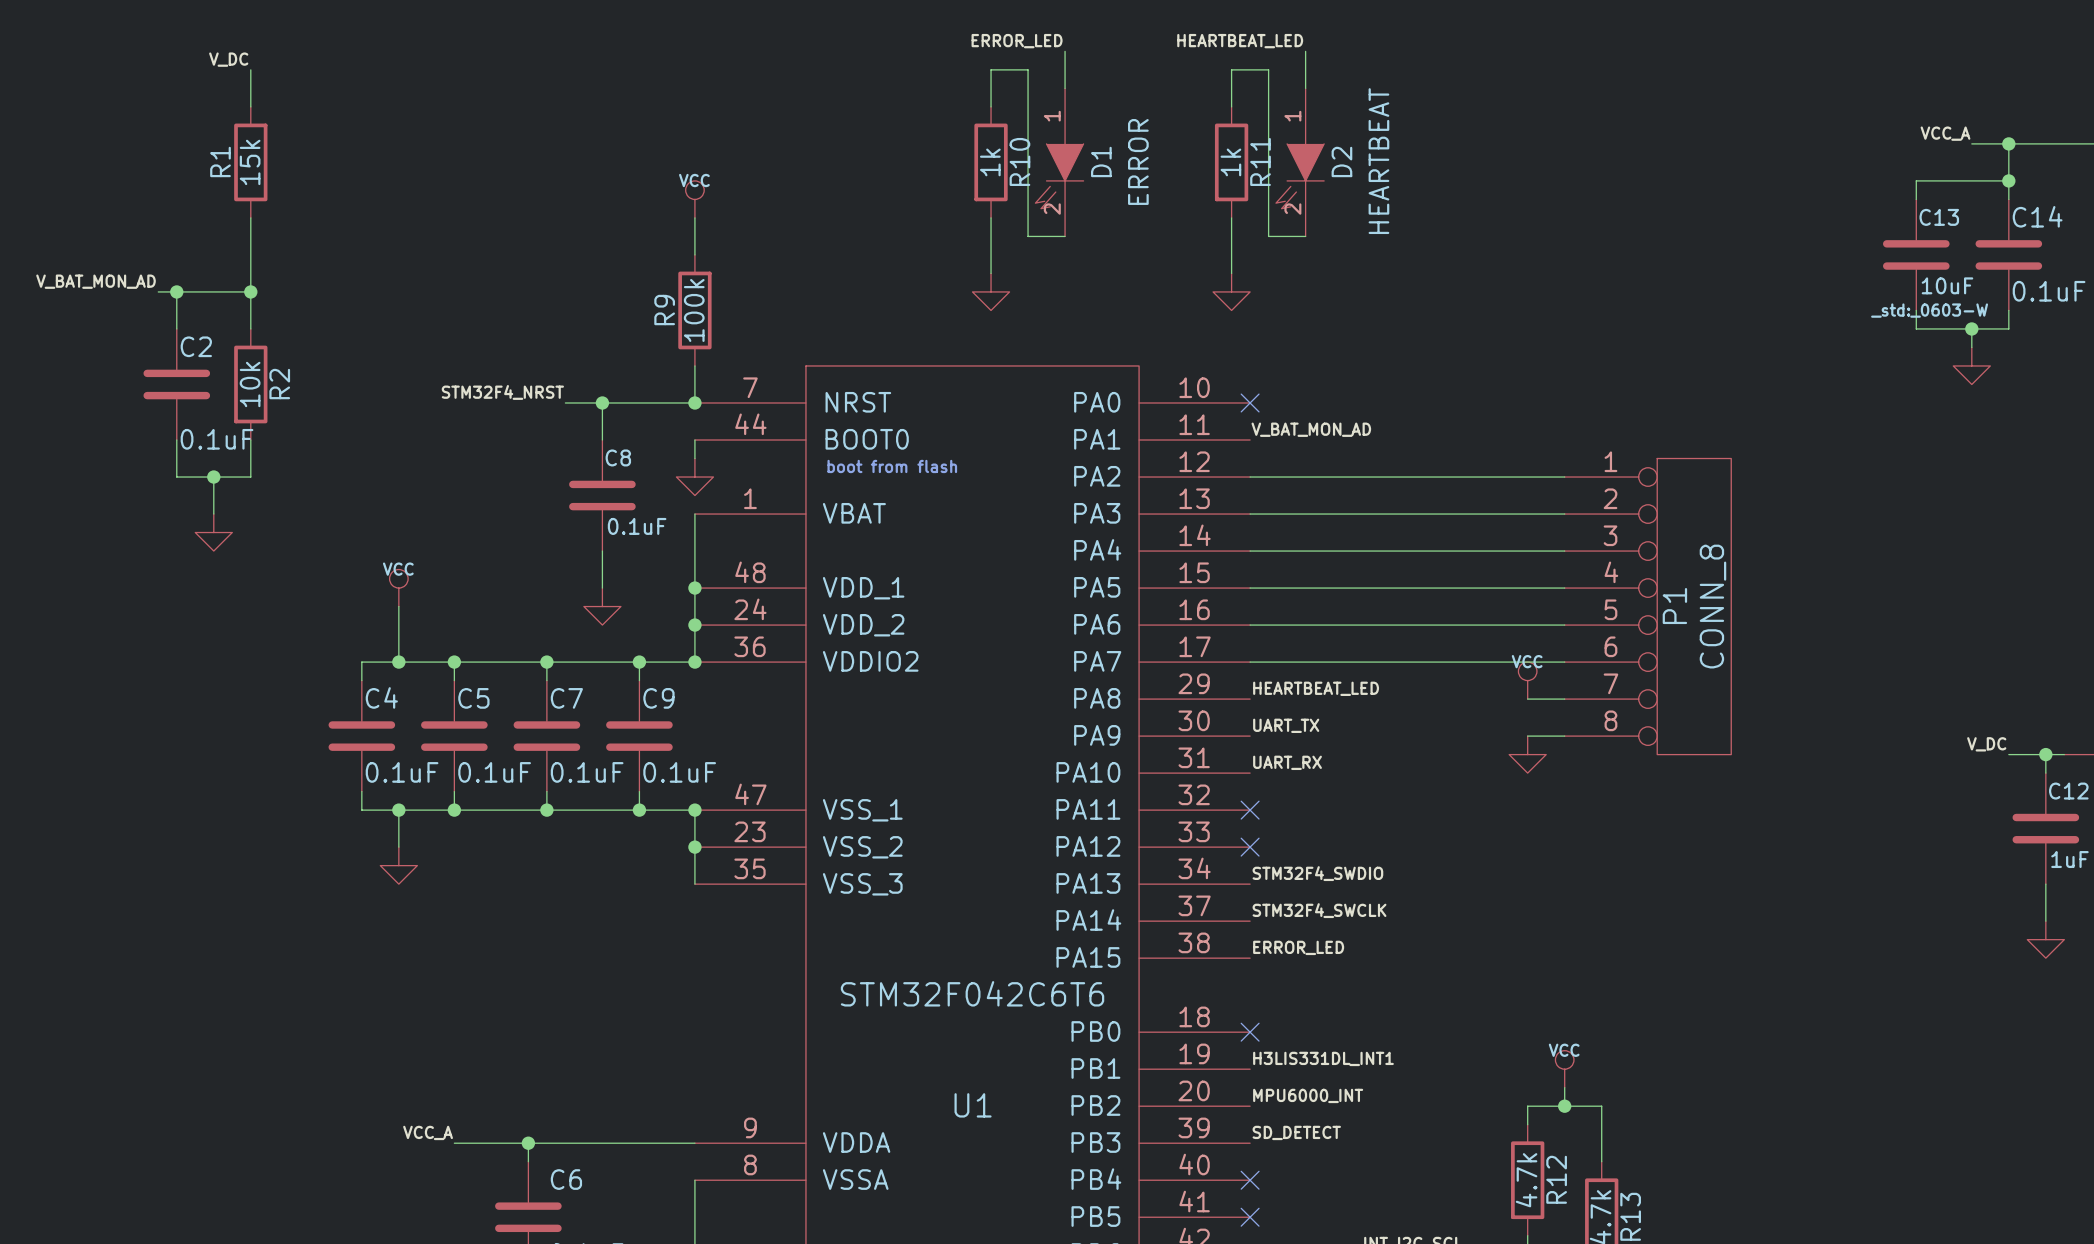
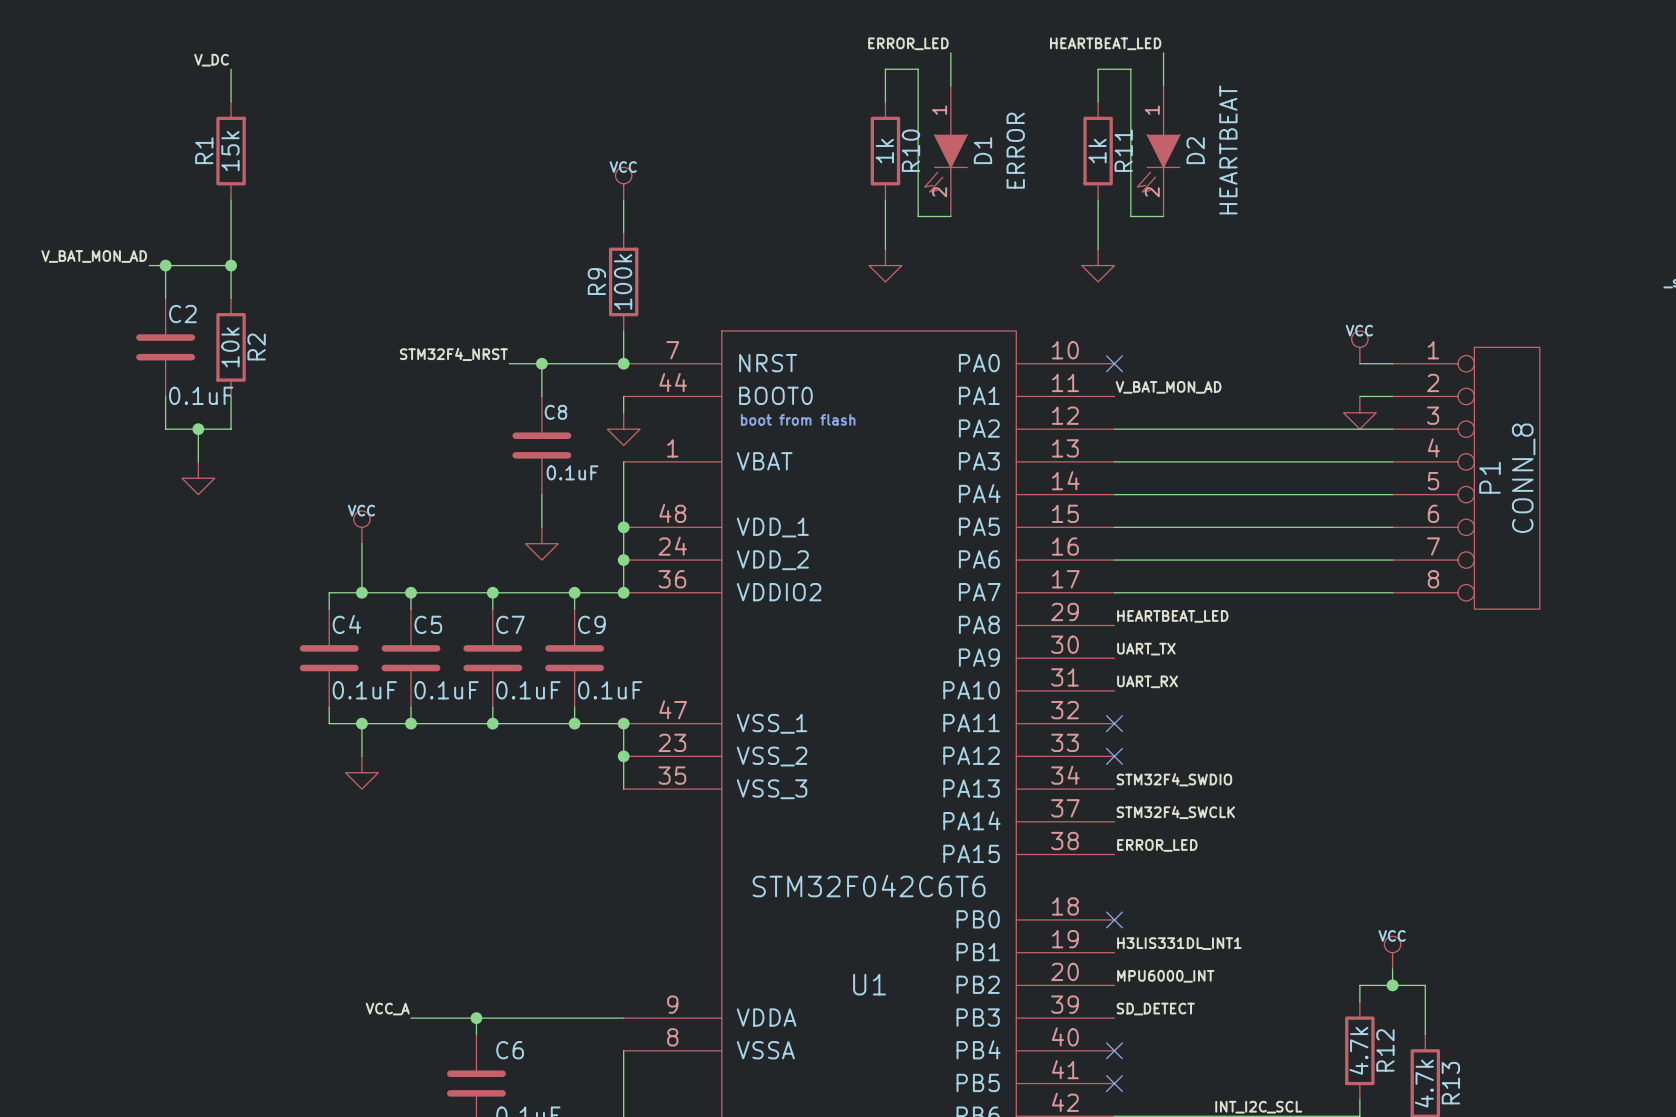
P1 position: (1647, 606) -> (1466, 478)
power symbol position: VCC (1527, 680) -> VCC (1359, 347)
wire: (1527, 699) (1564, 699) -> (1359, 396) (1392, 396)
wire: (1527, 736) (1564, 736) -> (1359, 363) (1392, 363)
power symbol position: (1527, 754) -> (1359, 412)

